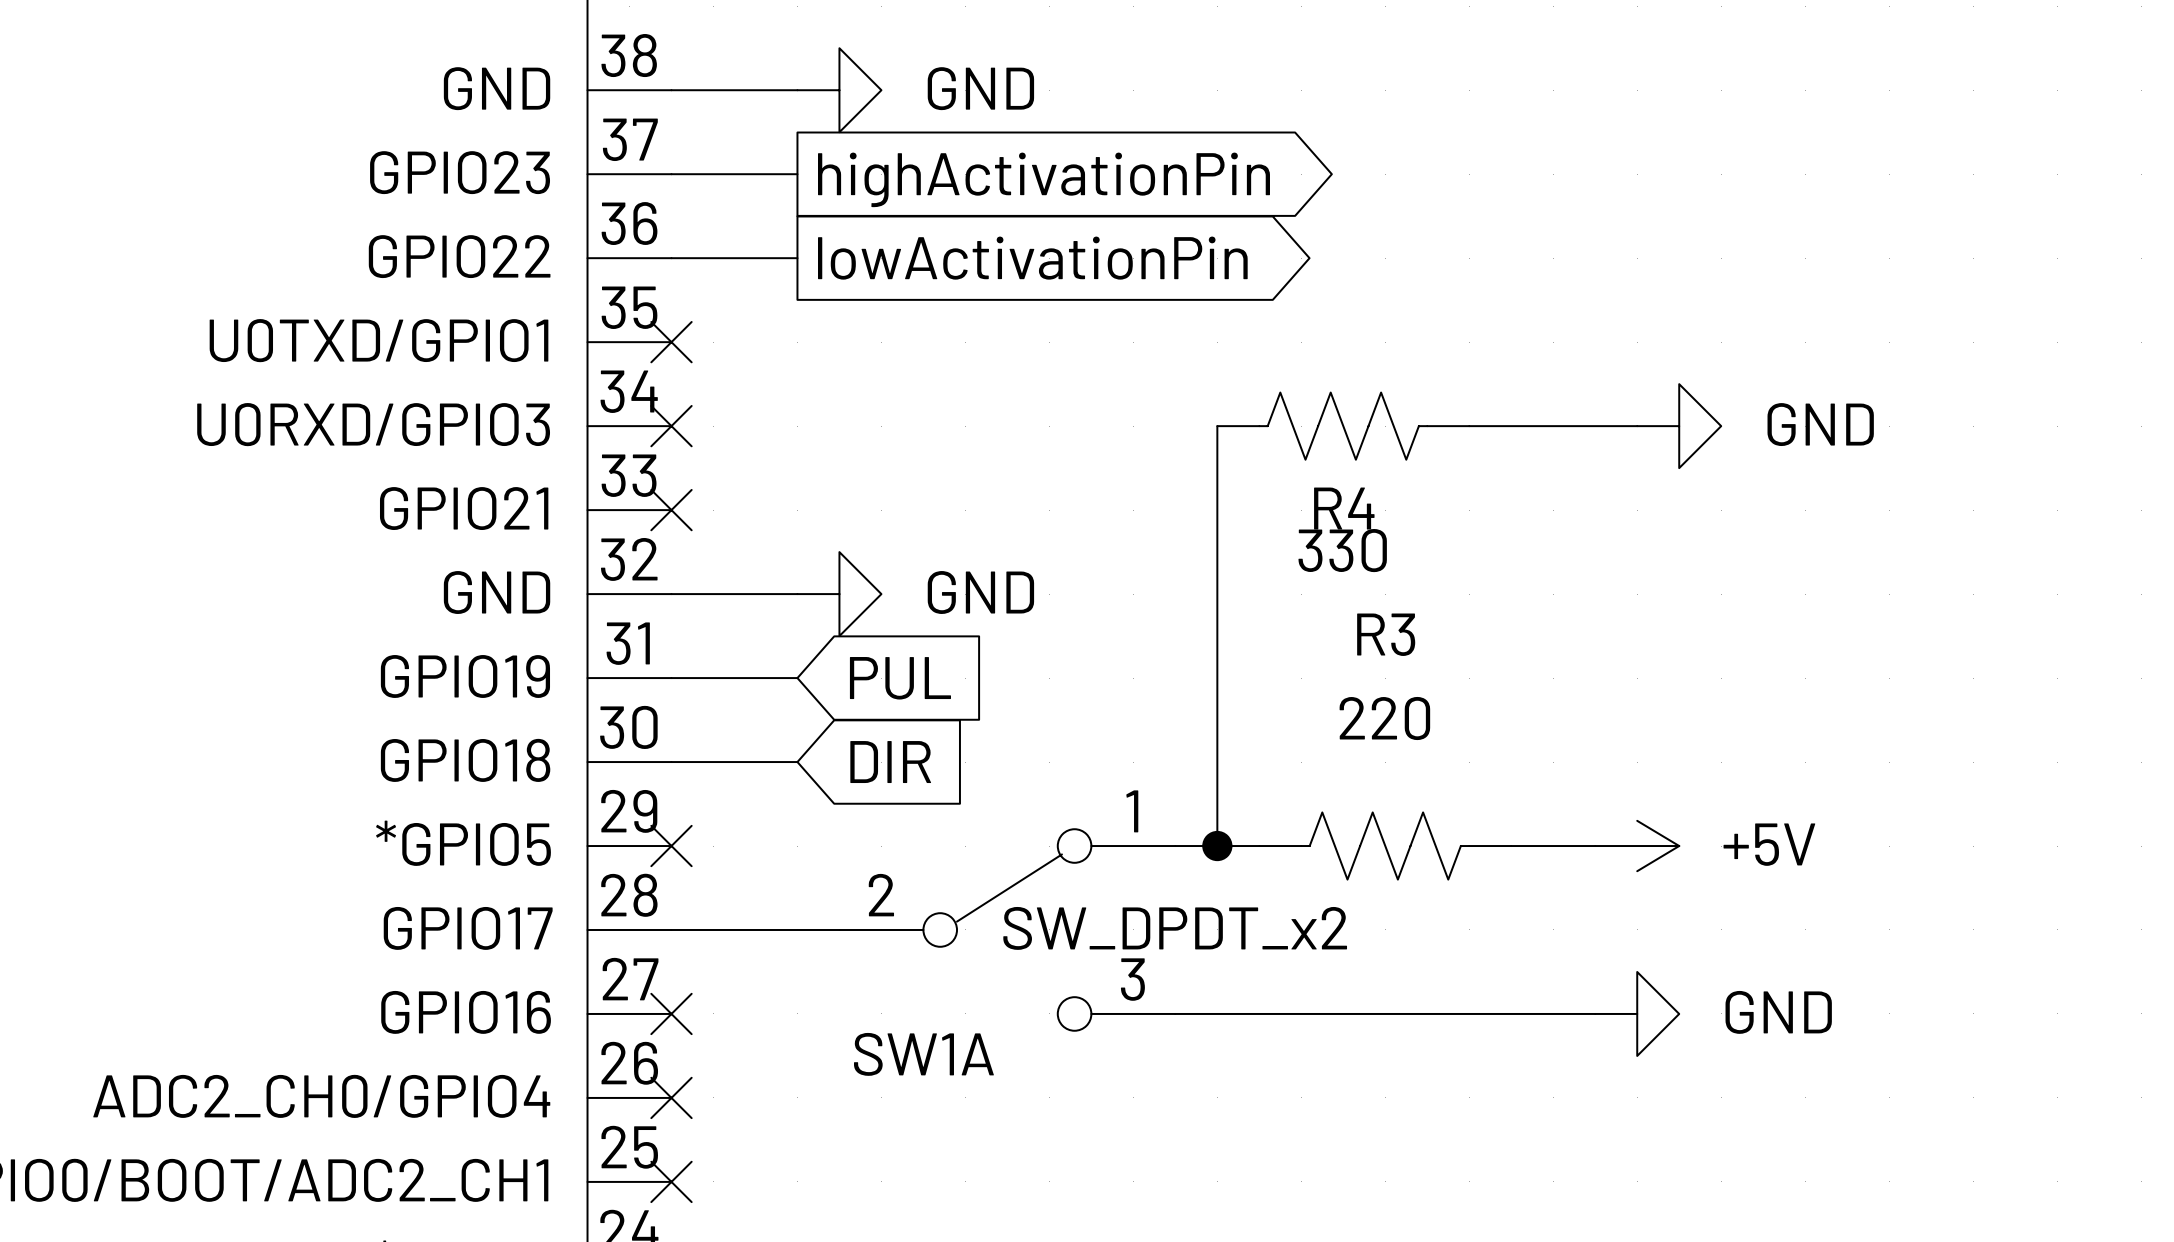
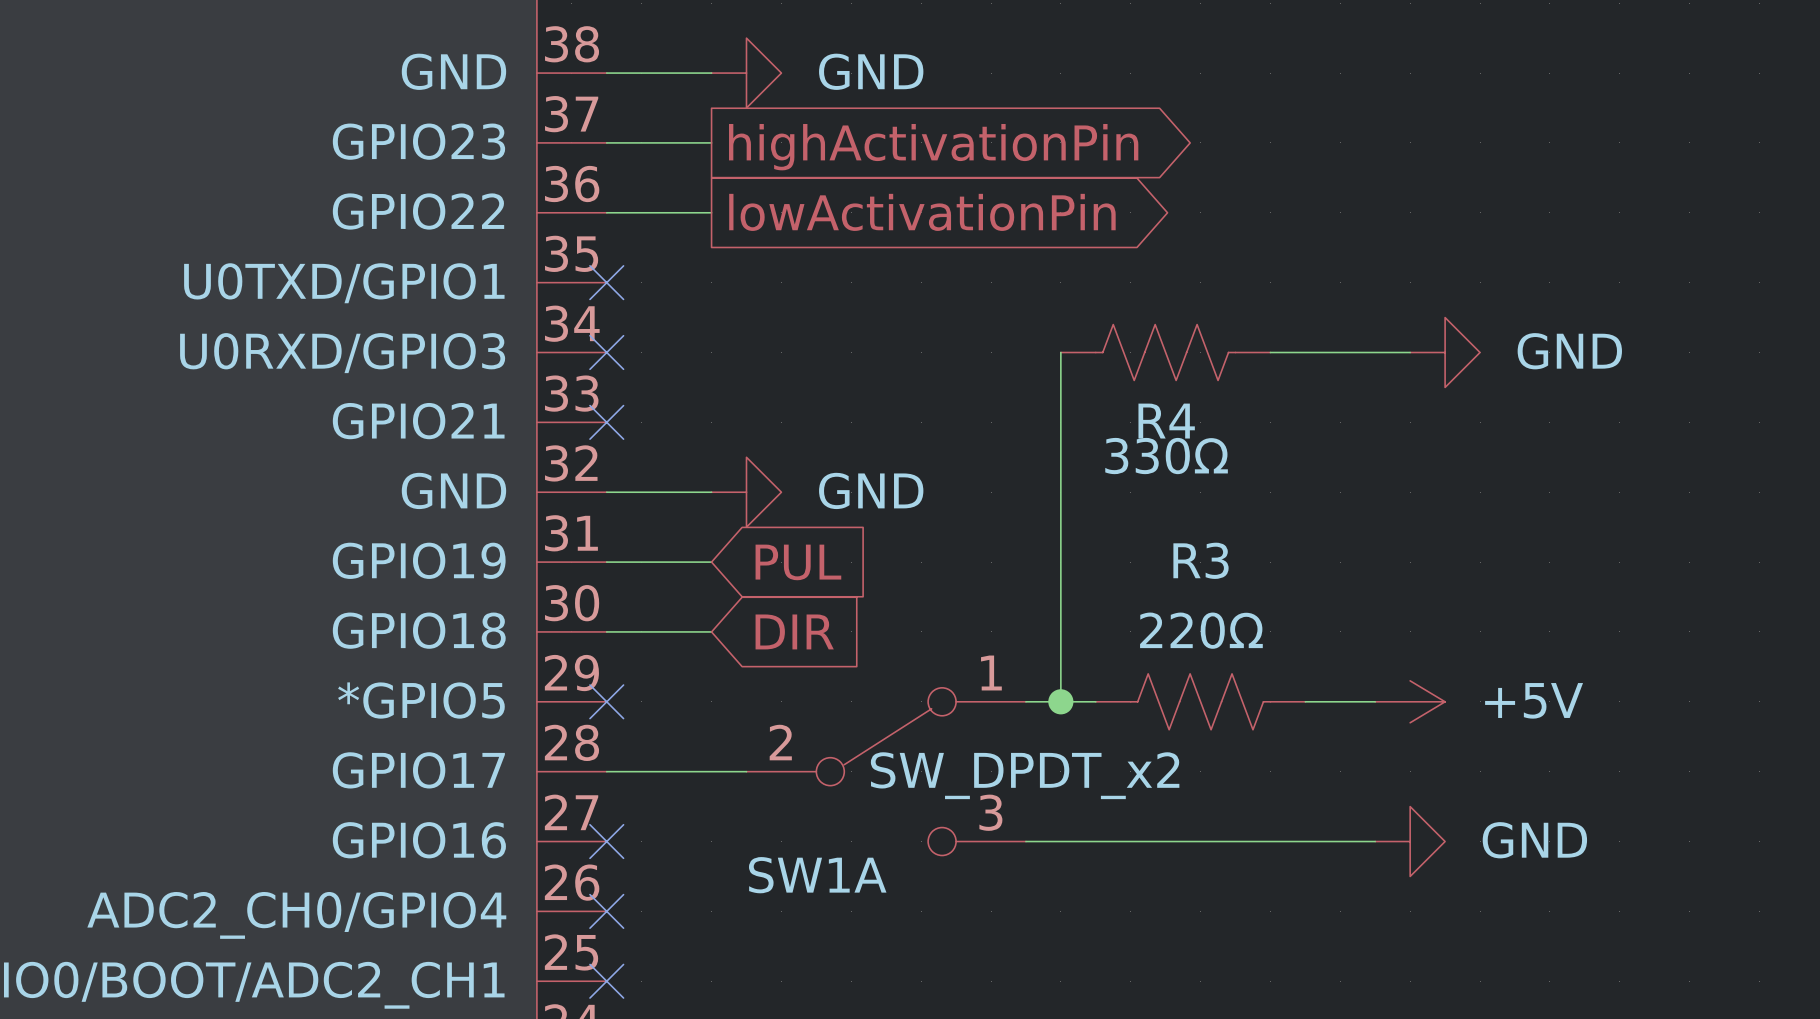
R4 value: 330 (1342, 550) -> 330Ω (1166, 456)
R3 name position: R3 (1386, 634) -> R3 (1201, 560)
R3 value: 220 (1384, 718) -> 220Ω (1201, 630)

